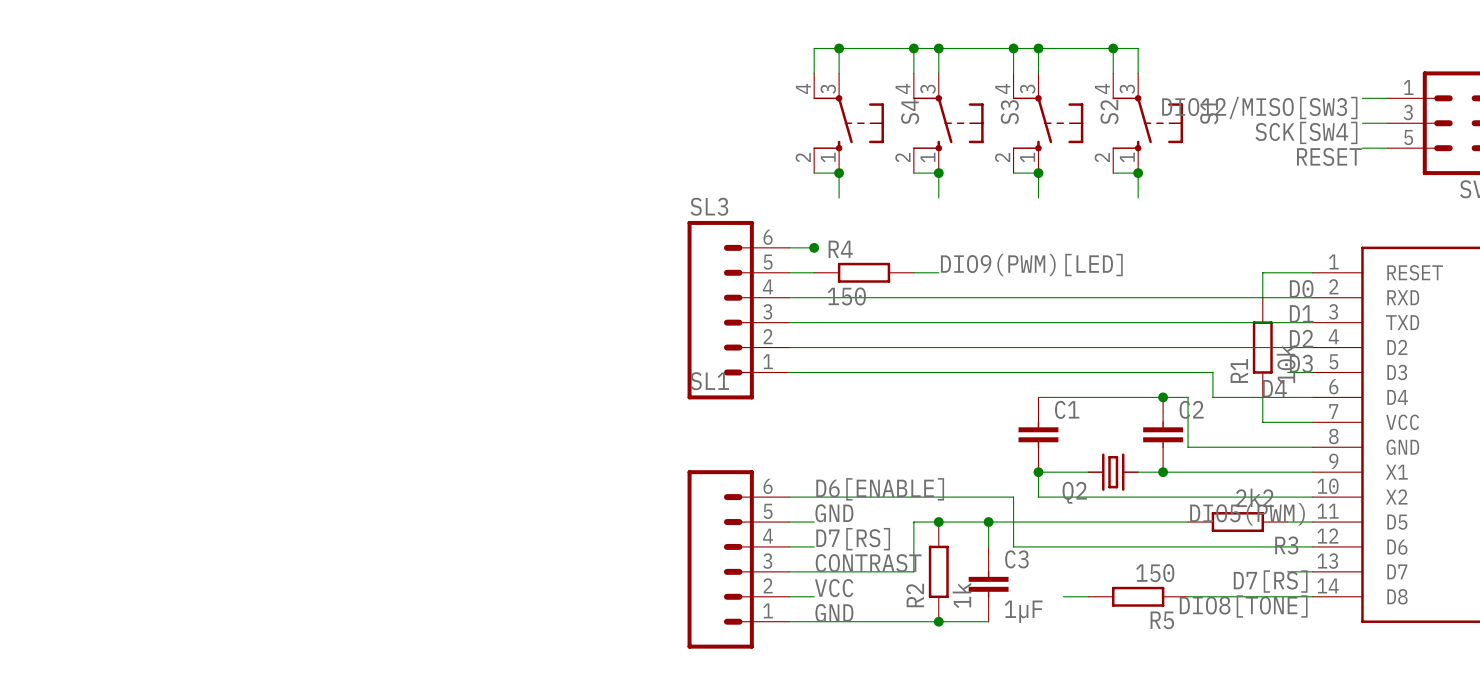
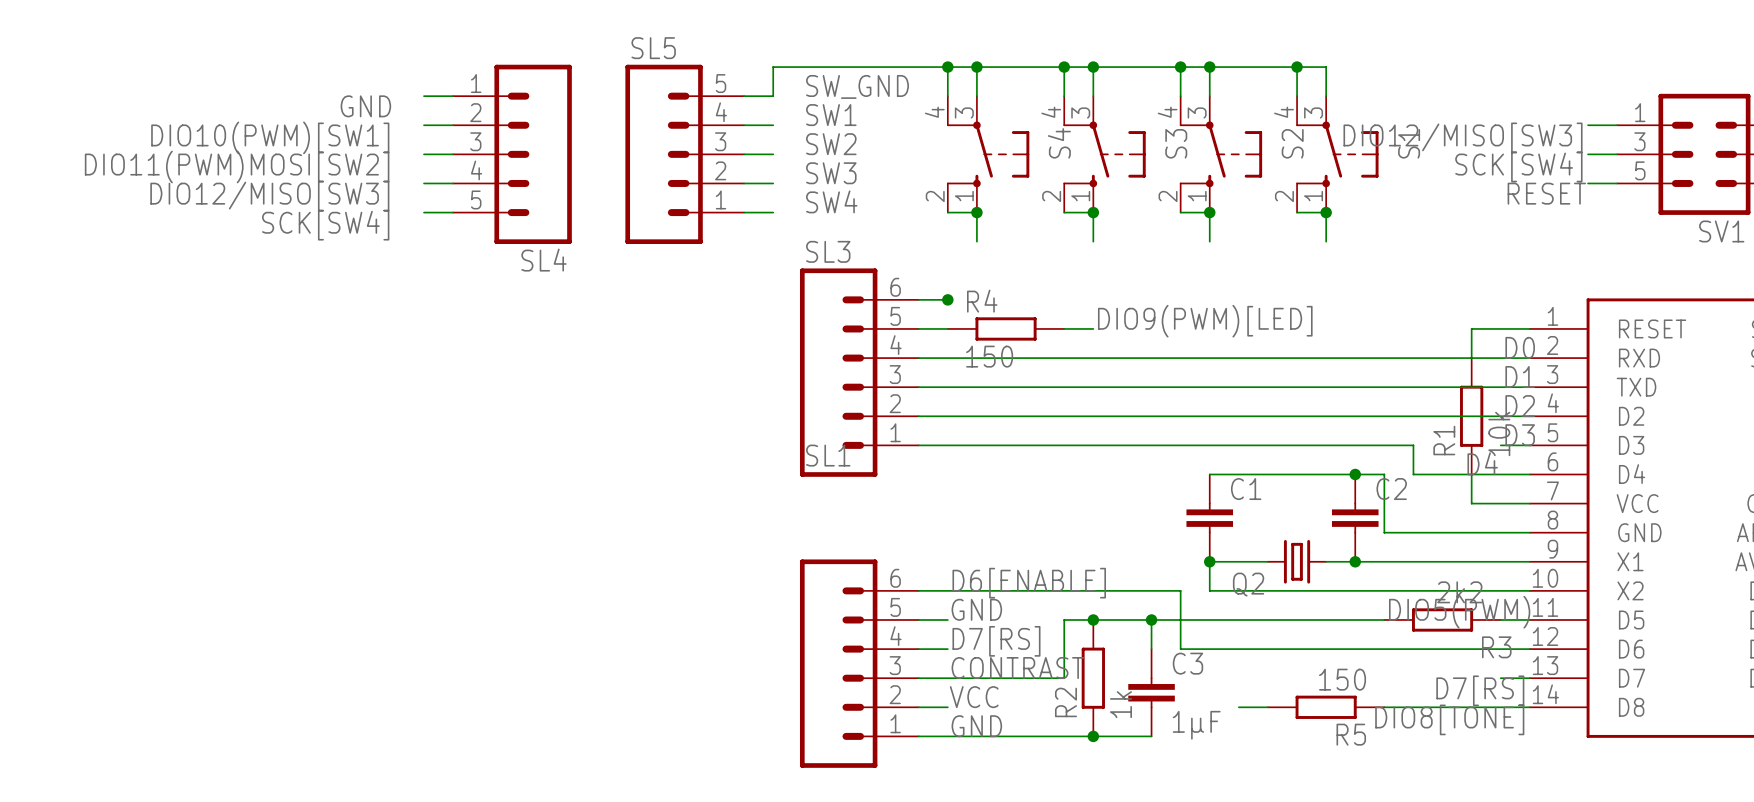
wire: none -> (947, 67) (773, 67) (773, 96) (744, 96)
junction: none -> (947, 67)
label: none -> SW_GND (857, 86)
wire: none -> (423, 96) (453, 96)
label: none -> GND (365, 106)
label: none -> SW1 (831, 115)
wire: none -> (423, 125) (453, 125)
wire: none -> (744, 125) (773, 125)
label: none -> DIO10(PWM)[SW1] (270, 137)
label: none -> SW2 (831, 144)
wire: none -> (423, 154) (453, 154)
SL4: none -> (512, 154)
SL5: none -> (684, 154)
wire: none -> (744, 154) (773, 154)
label: none -> DIO11(PWM)MOSI[SW2] (237, 166)
label: none -> SW3 (831, 173)
wire: none -> (423, 183) (453, 183)
wire: none -> (744, 183) (773, 183)
label: none -> DIO12/MISO[SW3] (269, 196)
label: none -> SW4 (831, 201)
wire: none -> (423, 212) (453, 212)
wire: none -> (744, 212) (773, 212)
label: none -> SCK[SW4] (325, 225)

